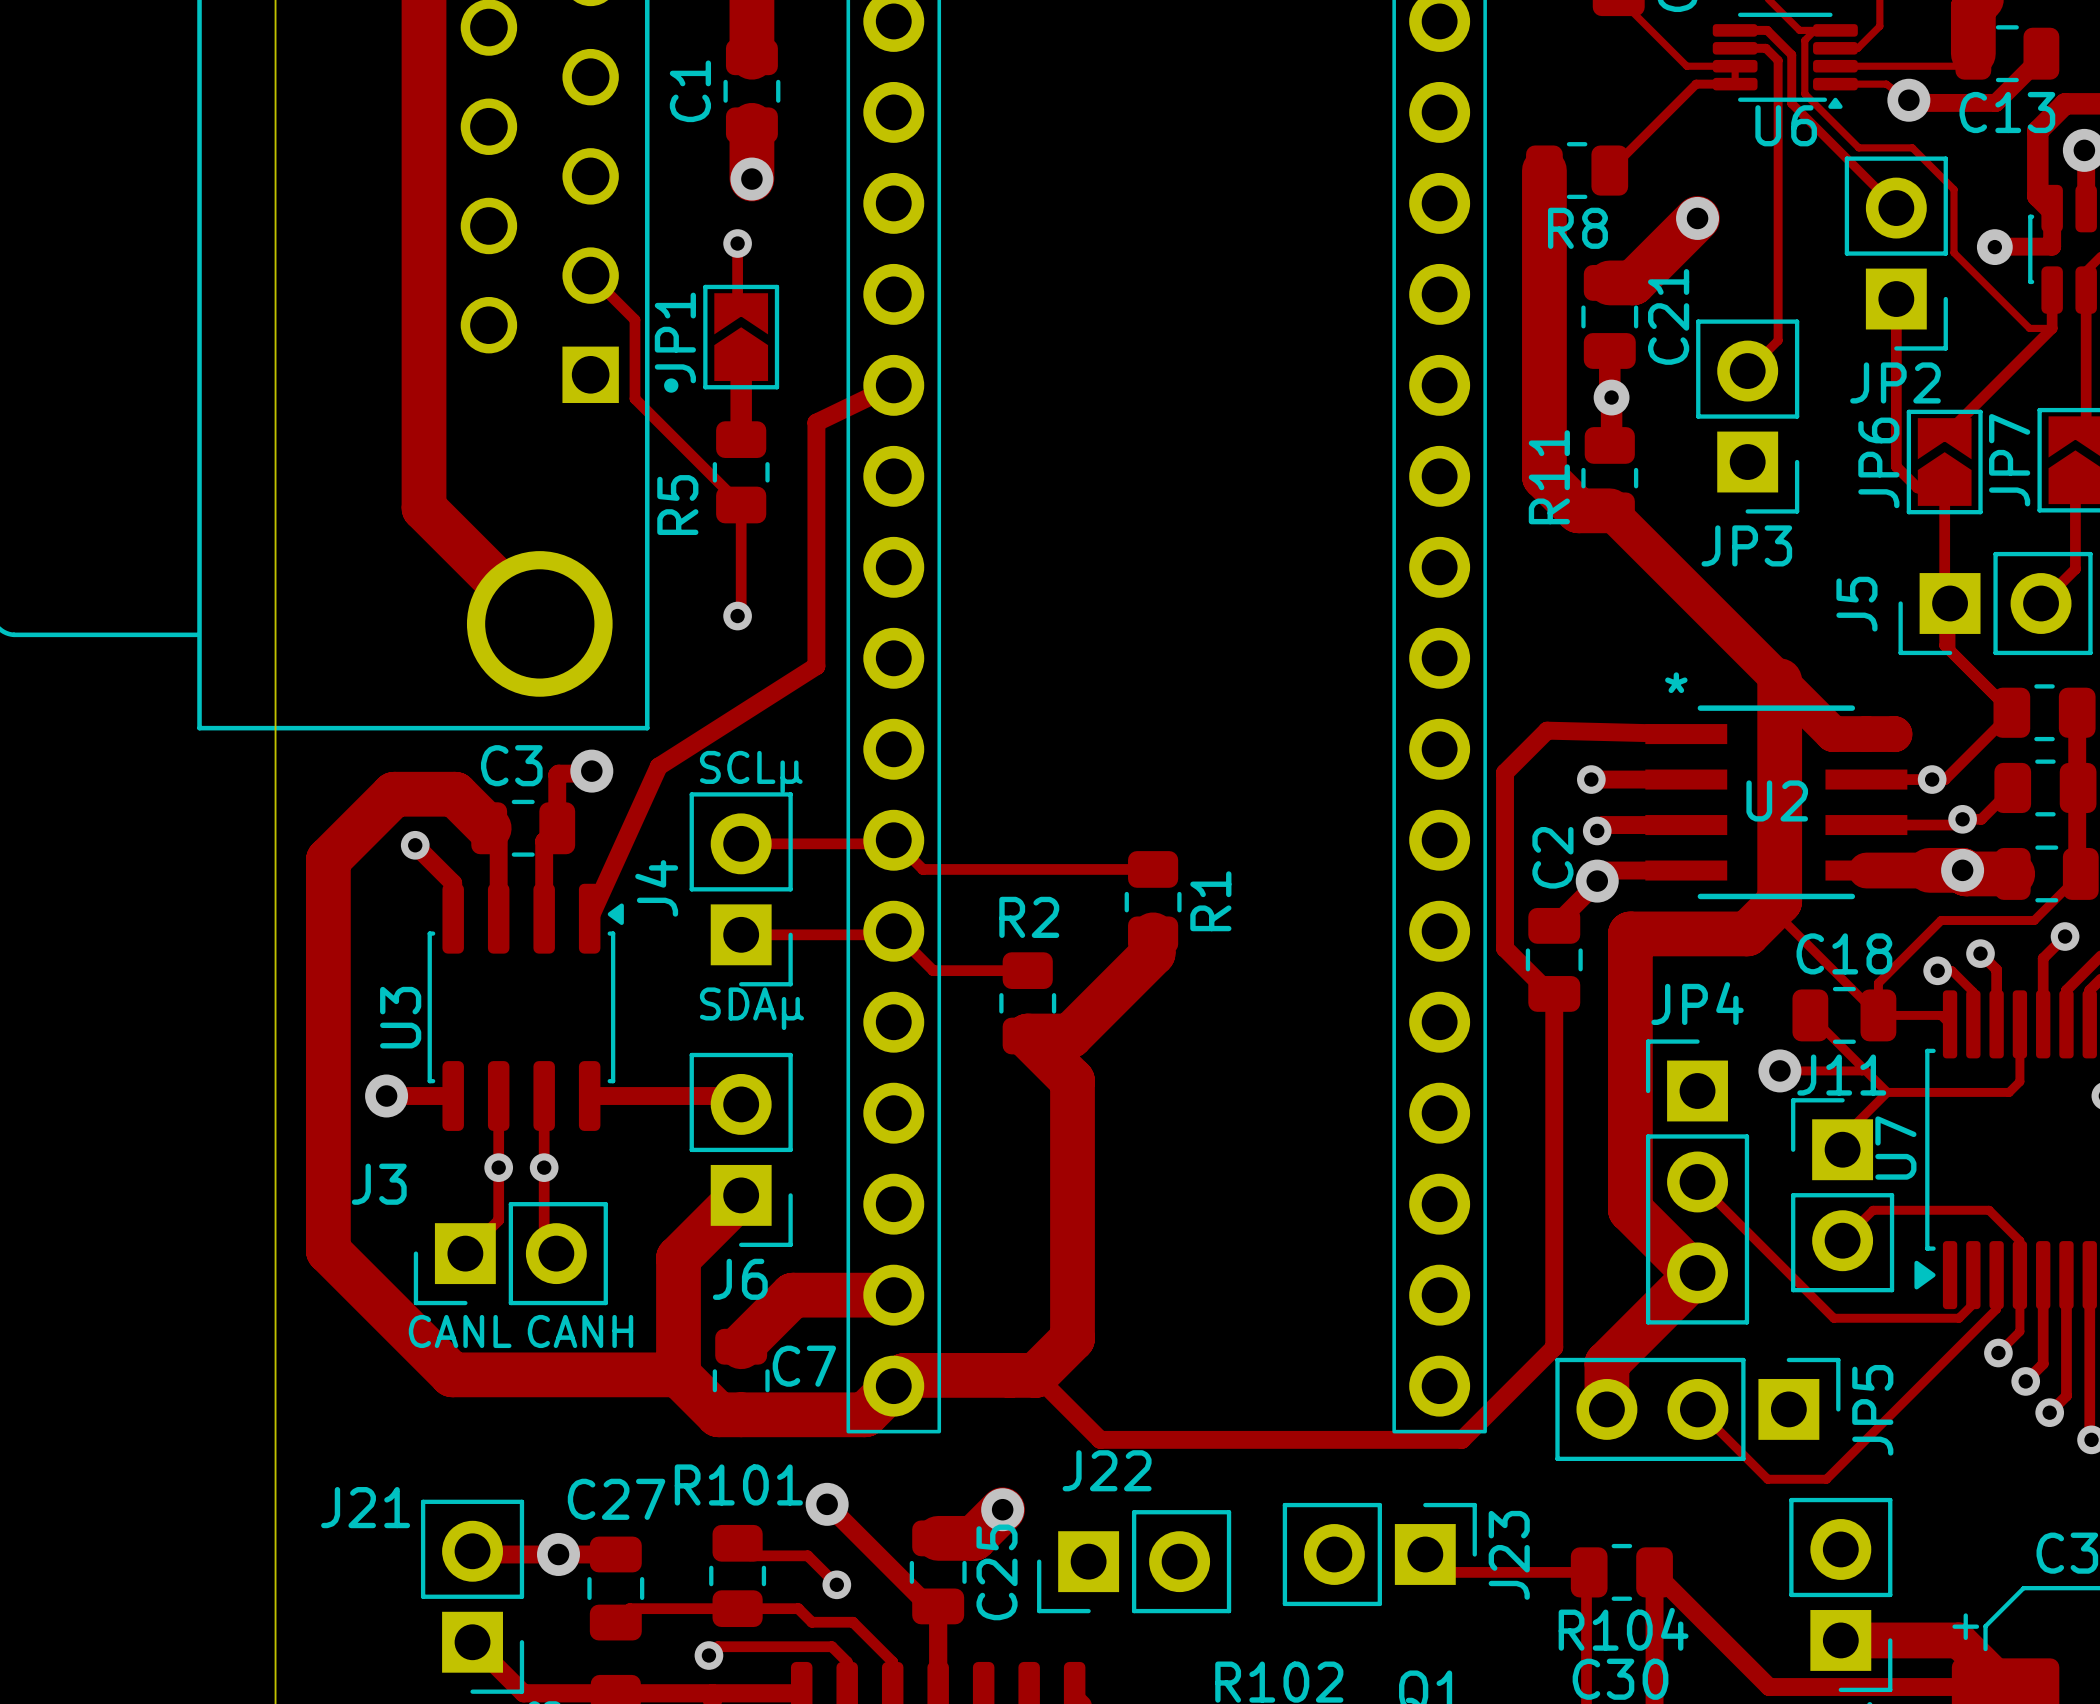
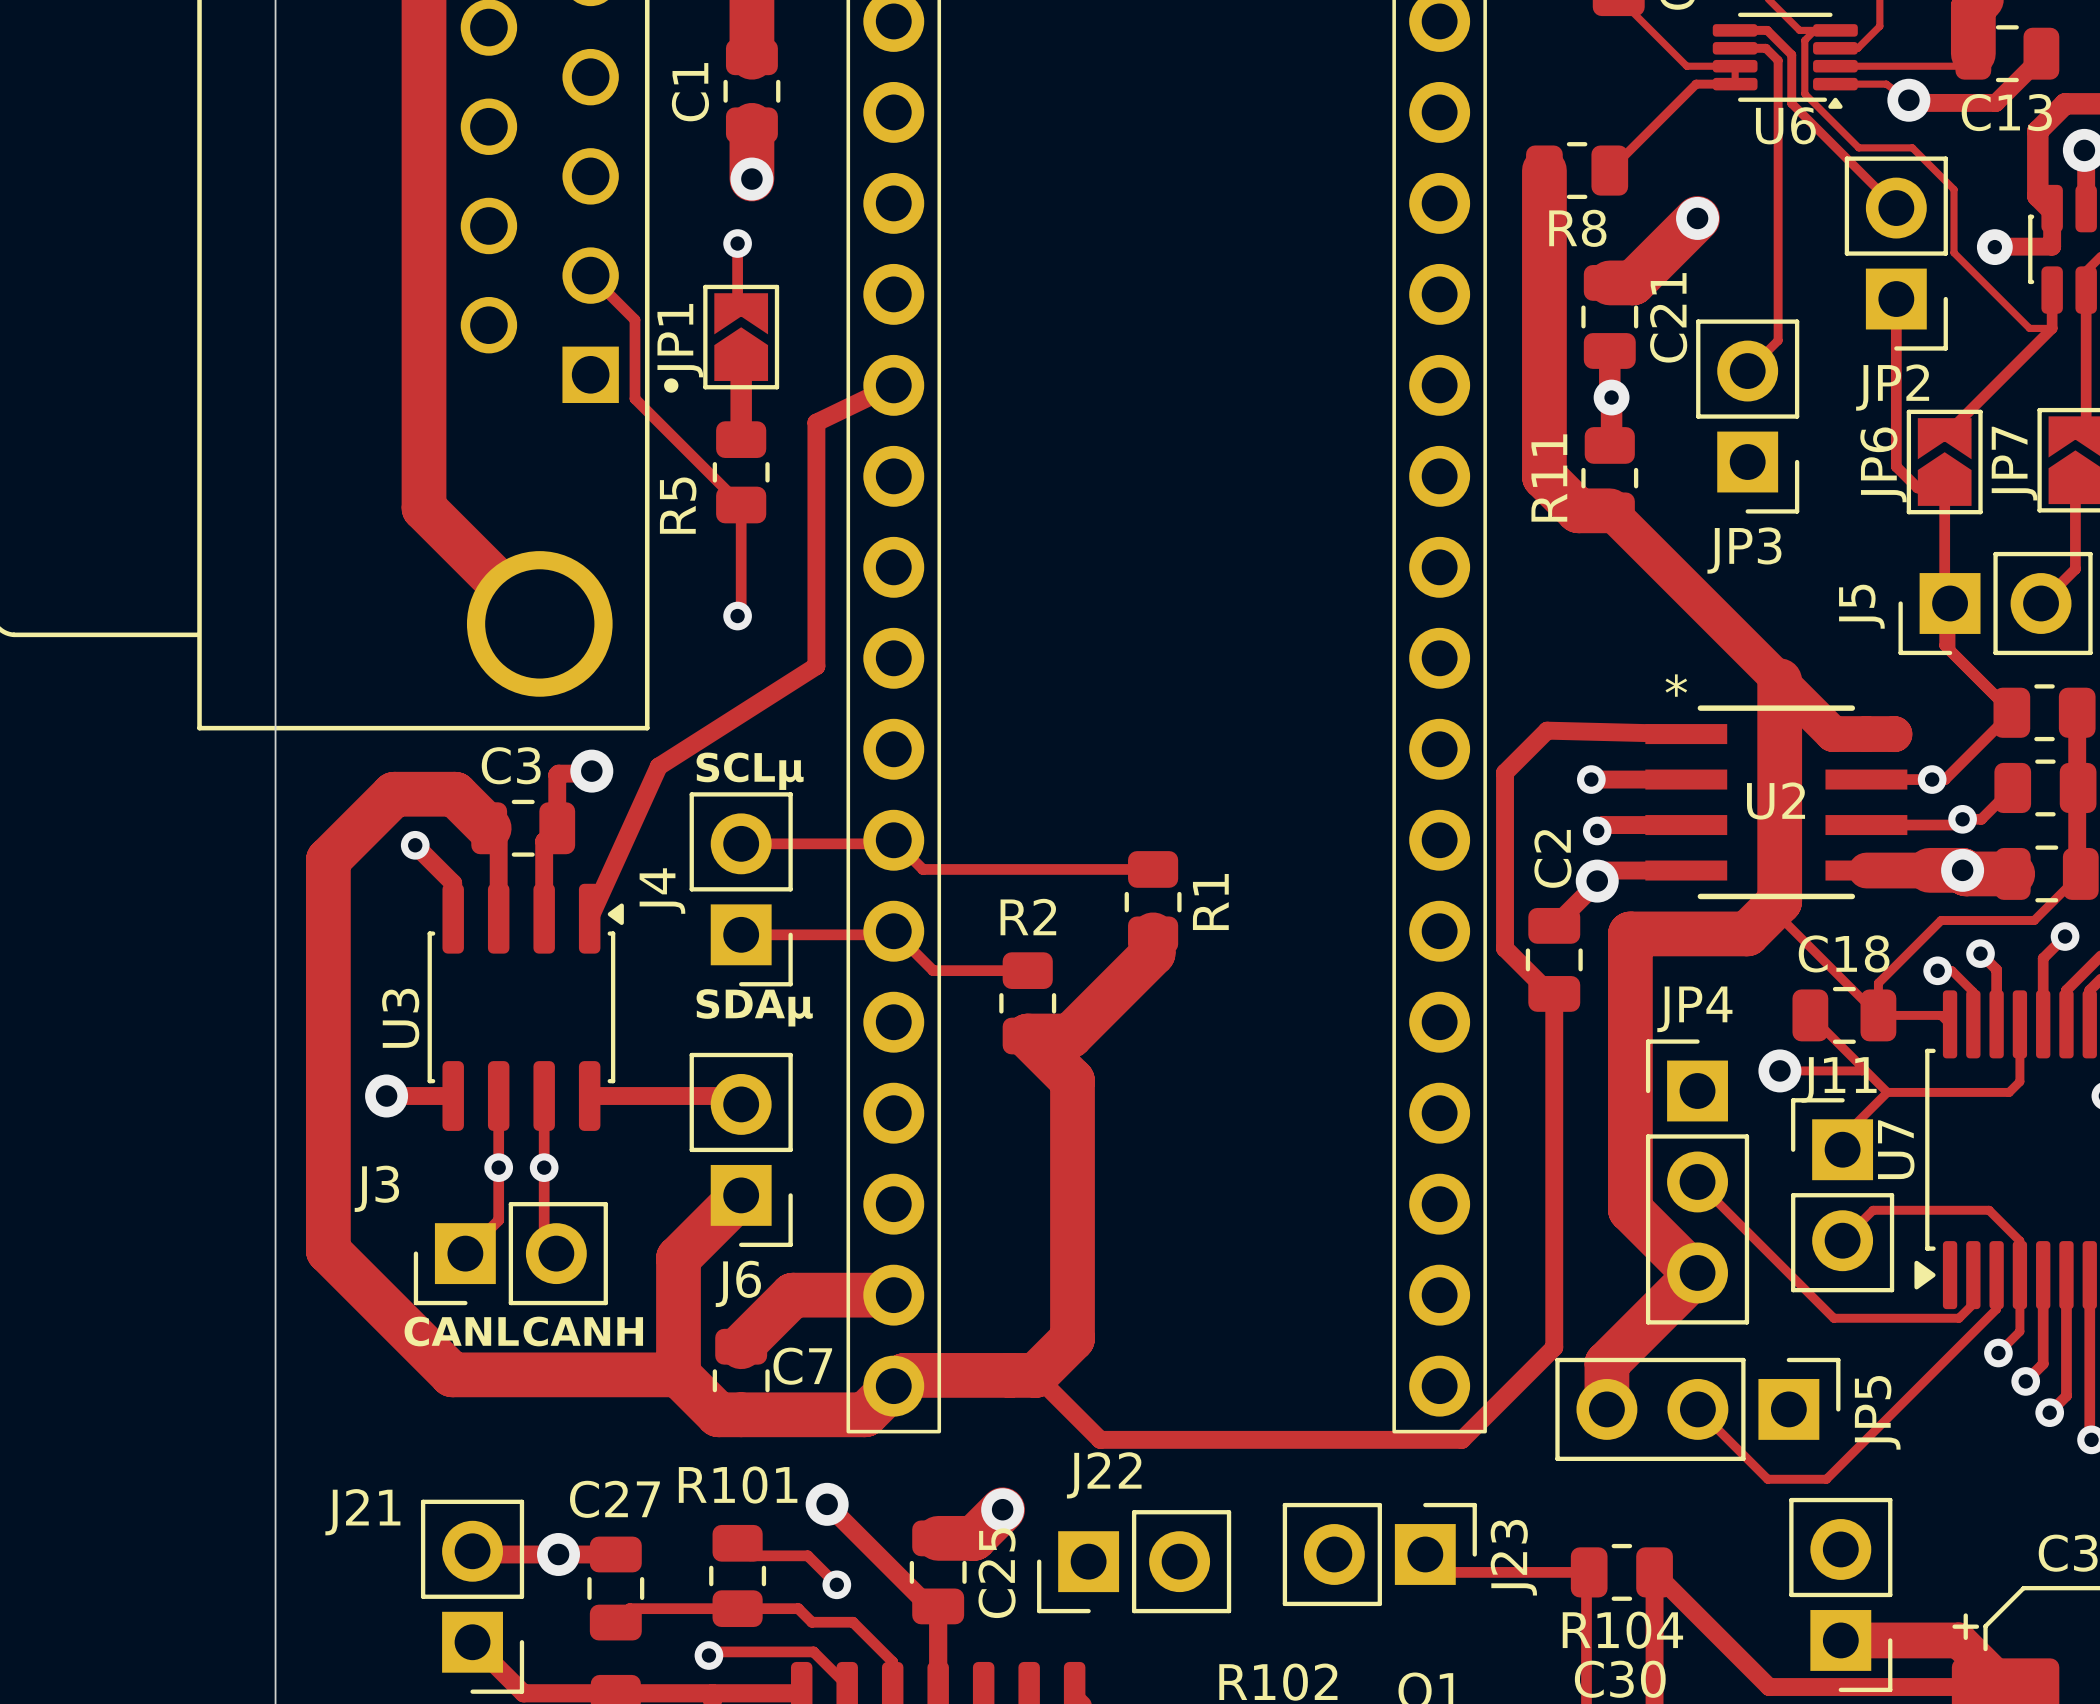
track: (712, 1651) (717, 1646) (831, 1646) (847, 1661) (847, 1685) -> (712, 1651) (813, 1651) (847, 1685)

